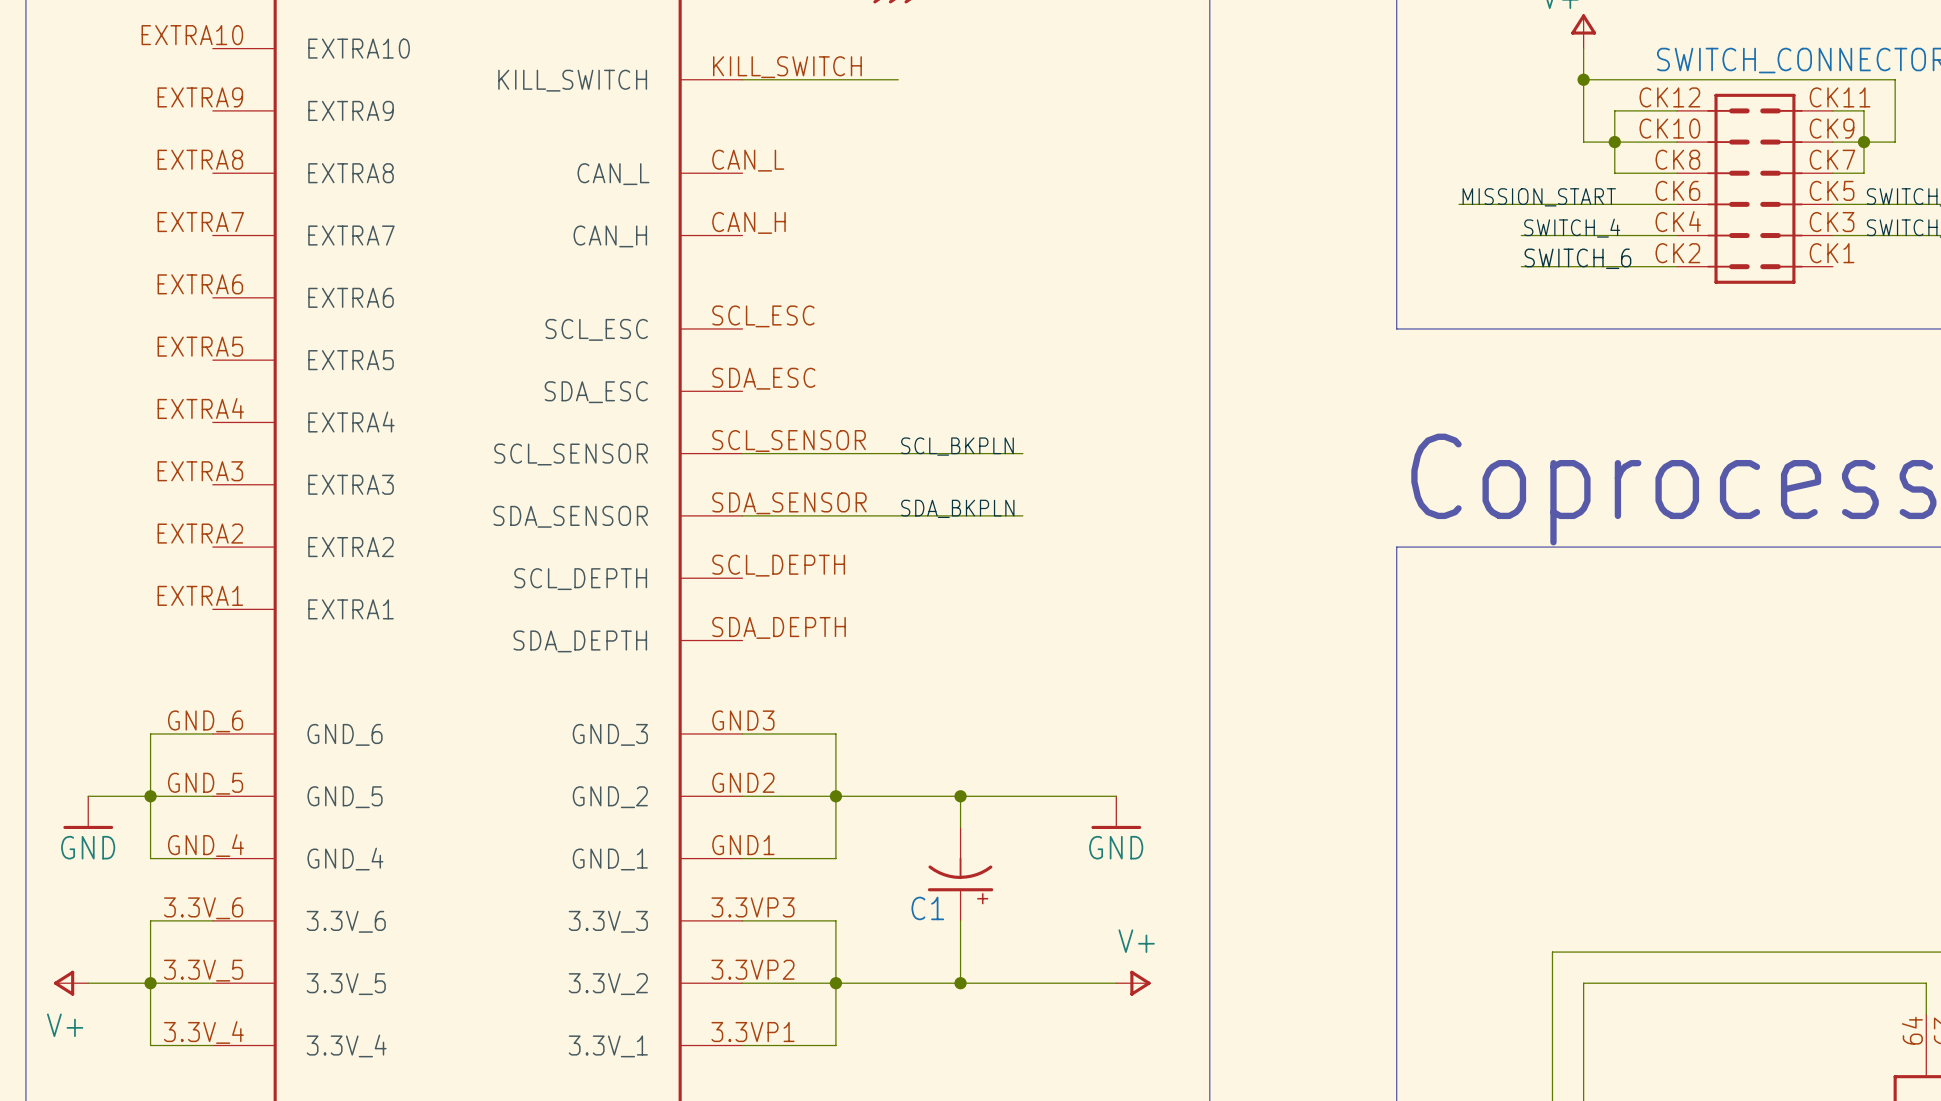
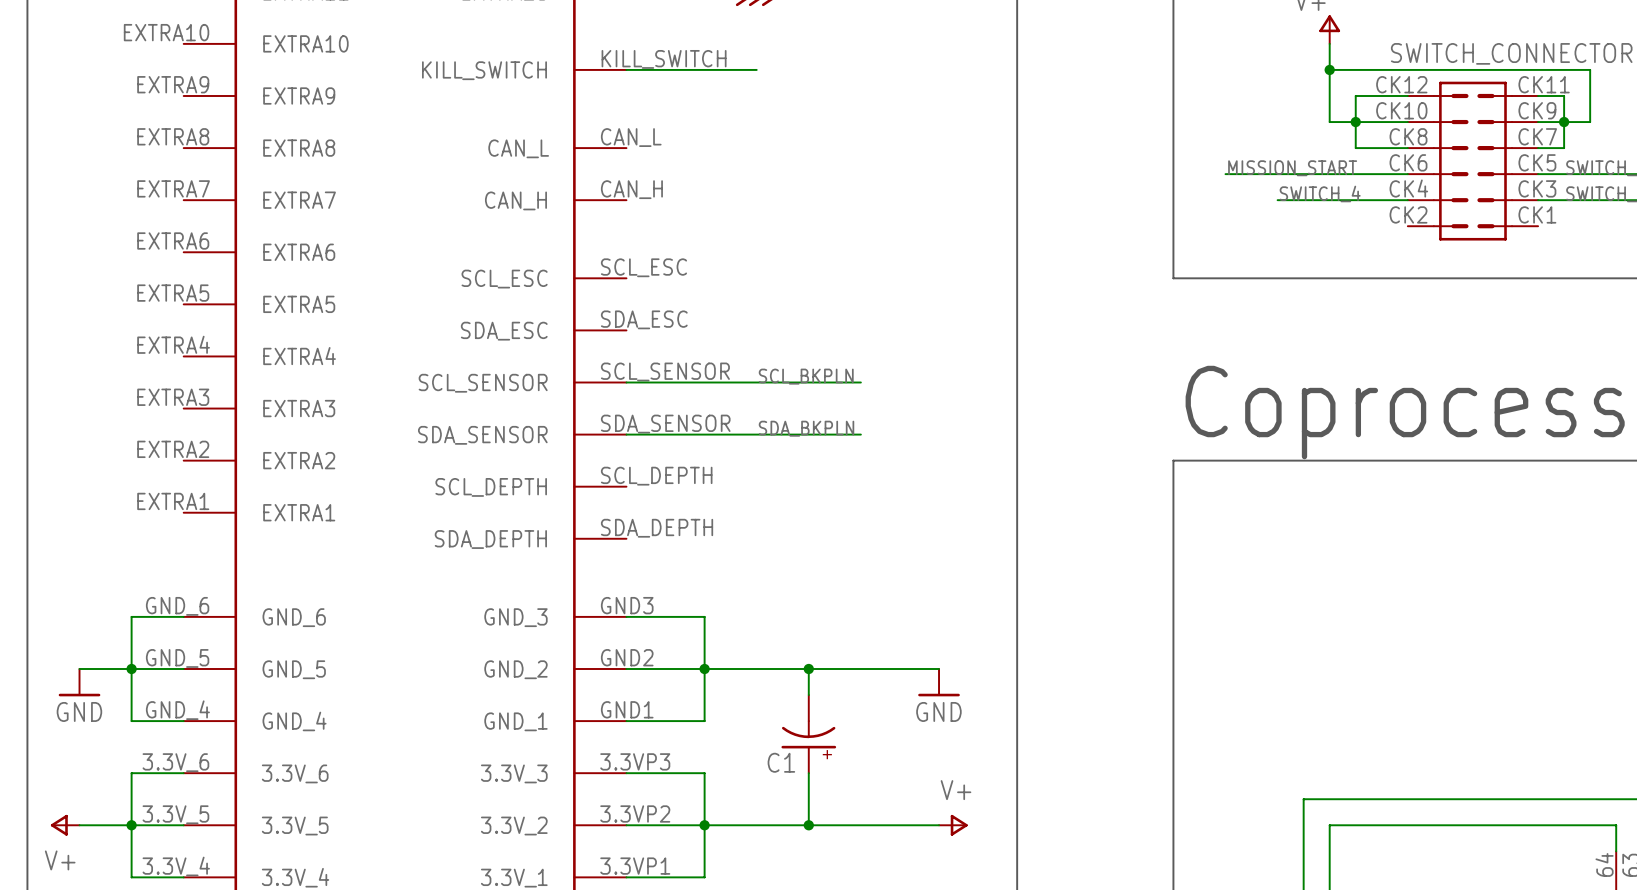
label: SWITCH_6 (1577, 258) -> none
wire: (1521, 266) (1677, 266) -> none

